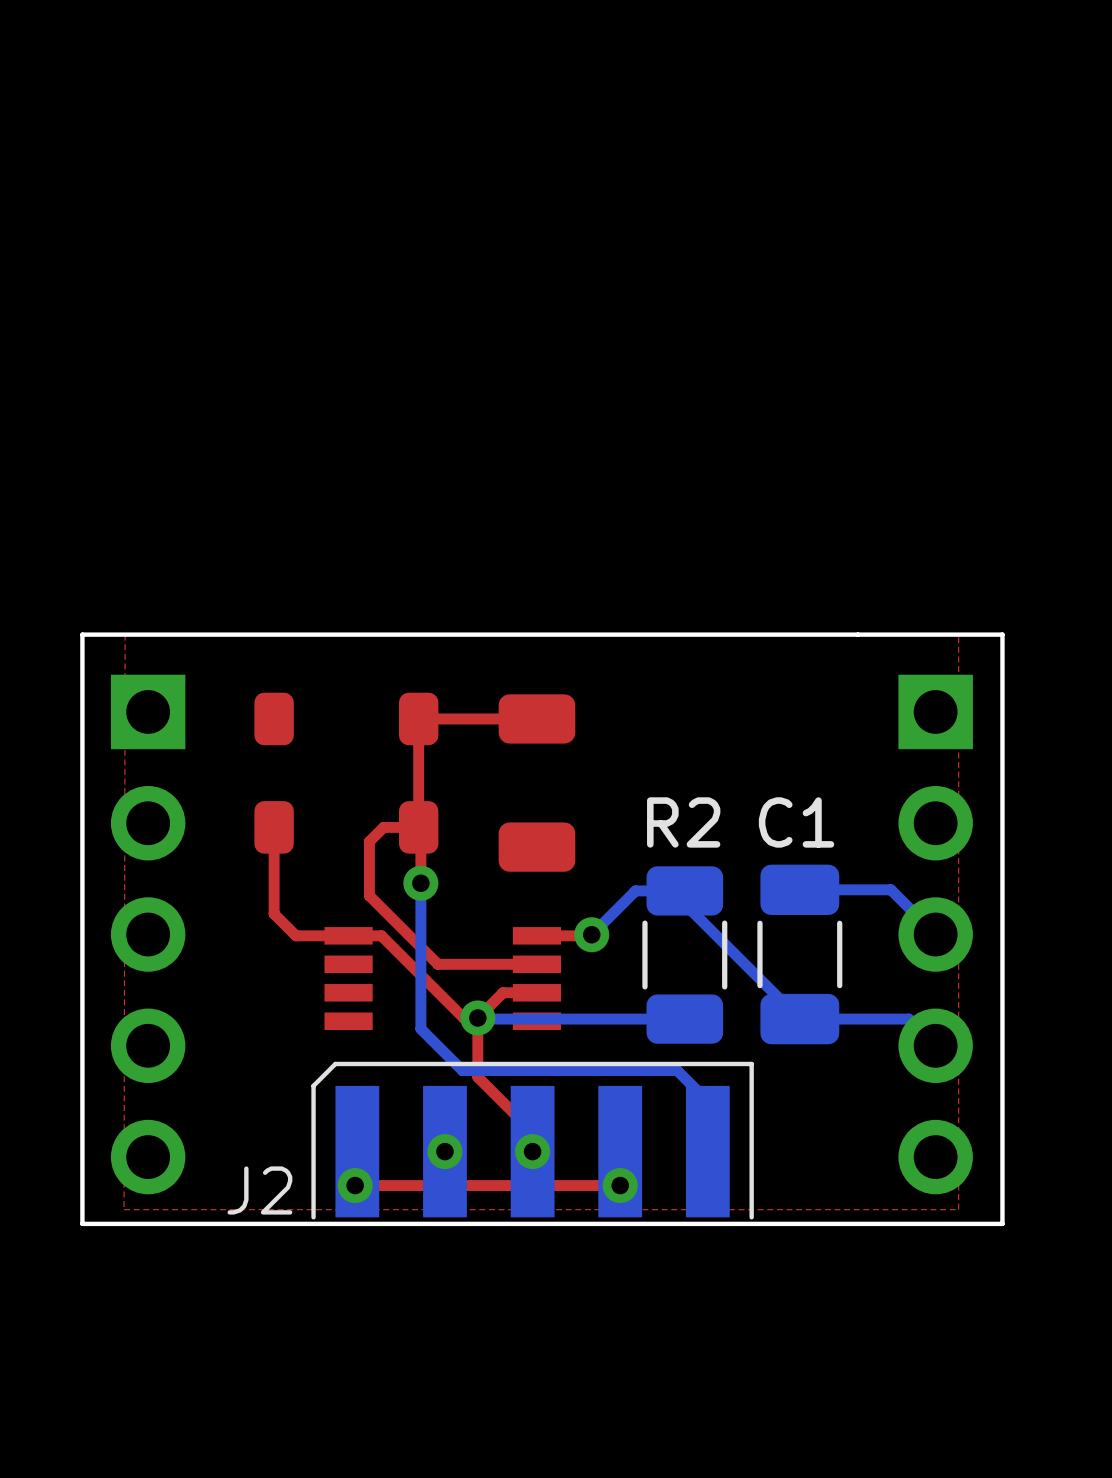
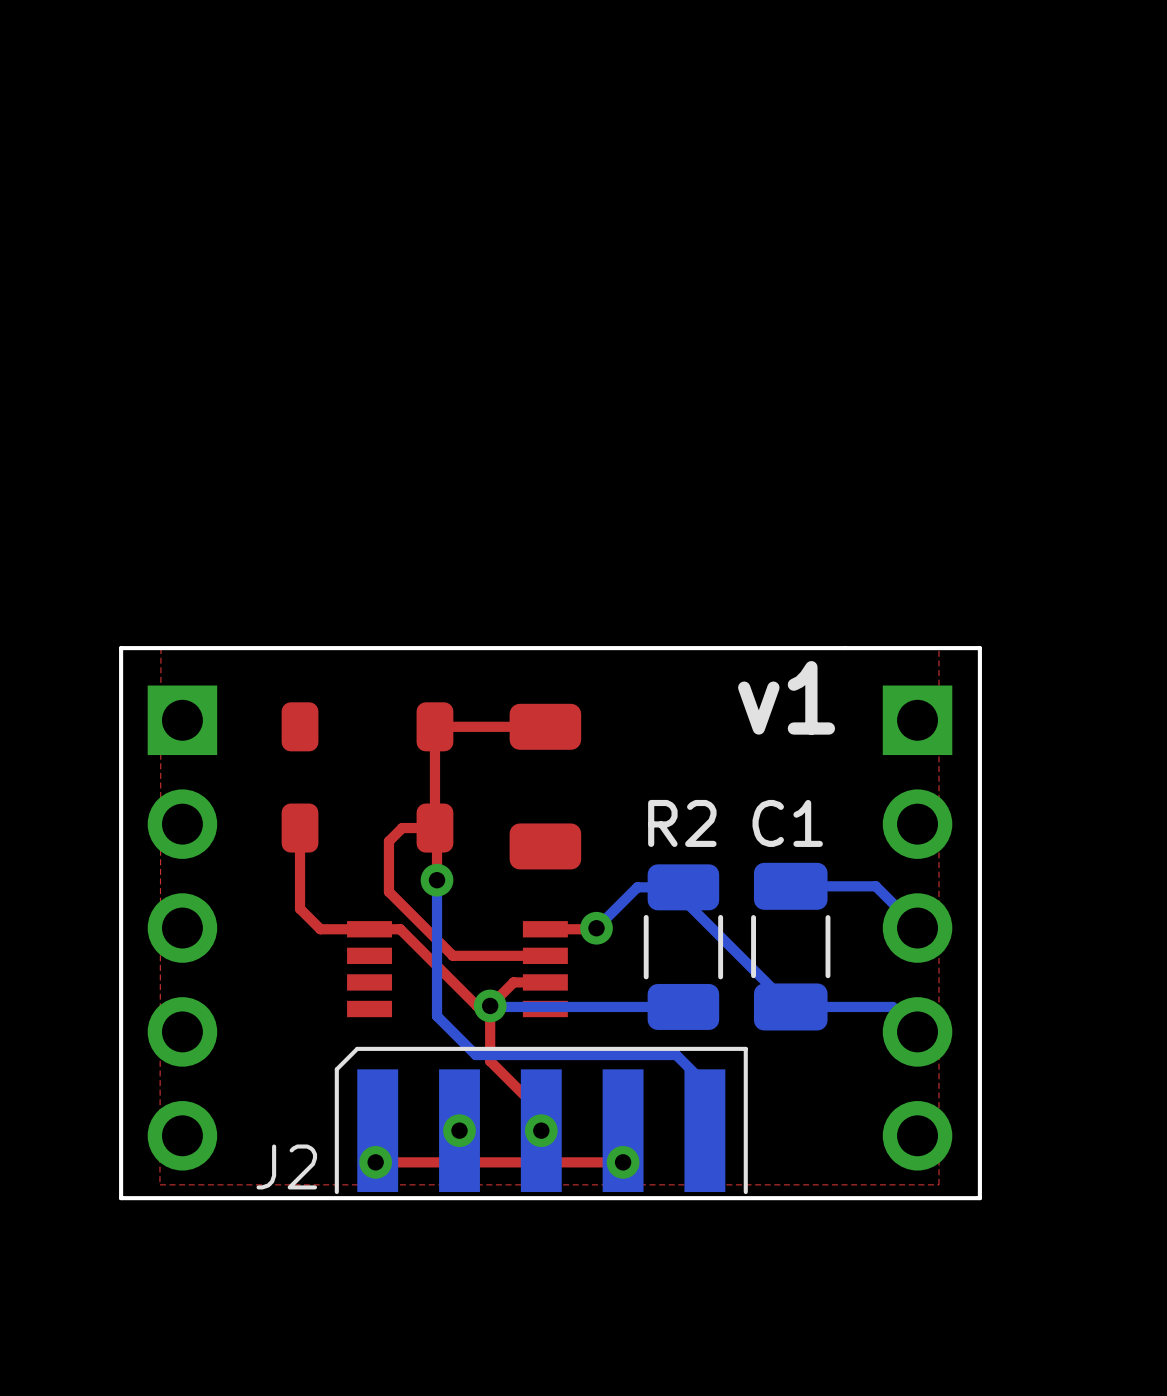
text: none -> v1 (786, 697)

